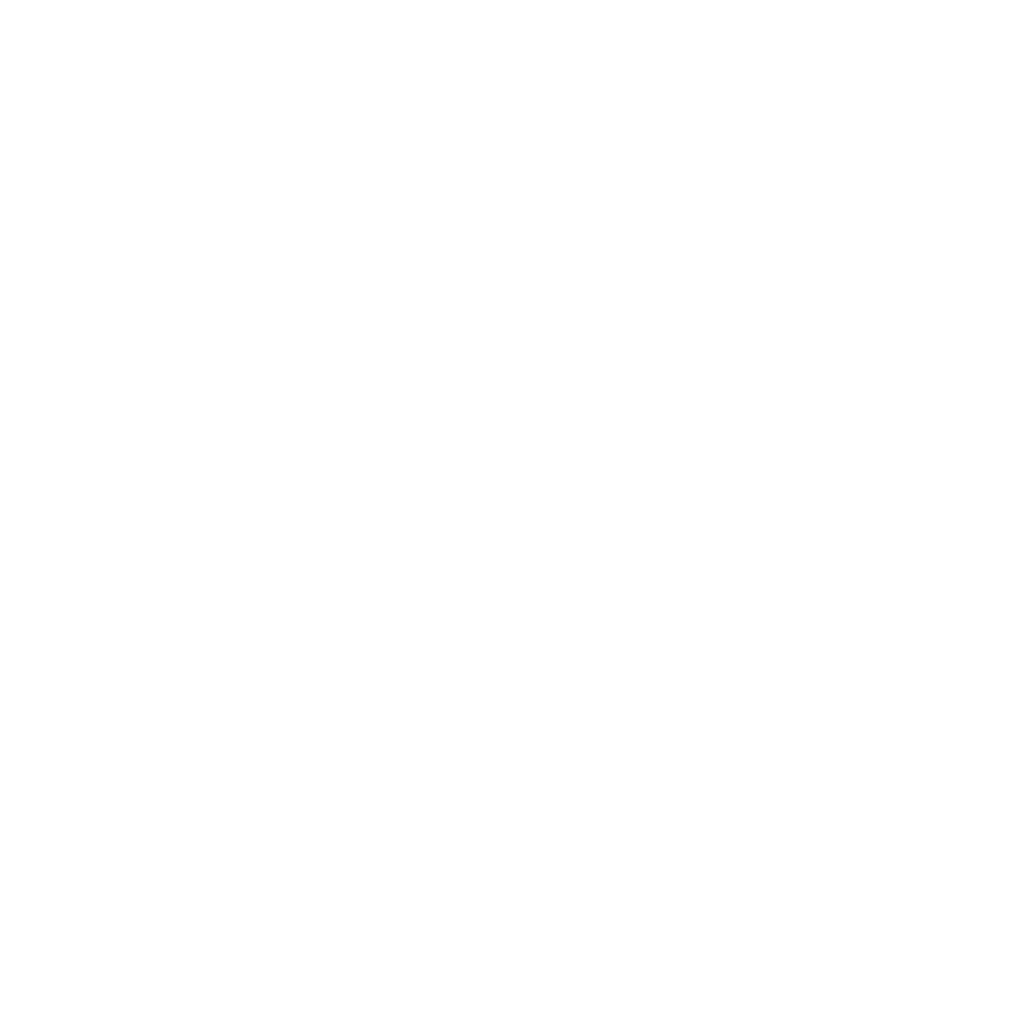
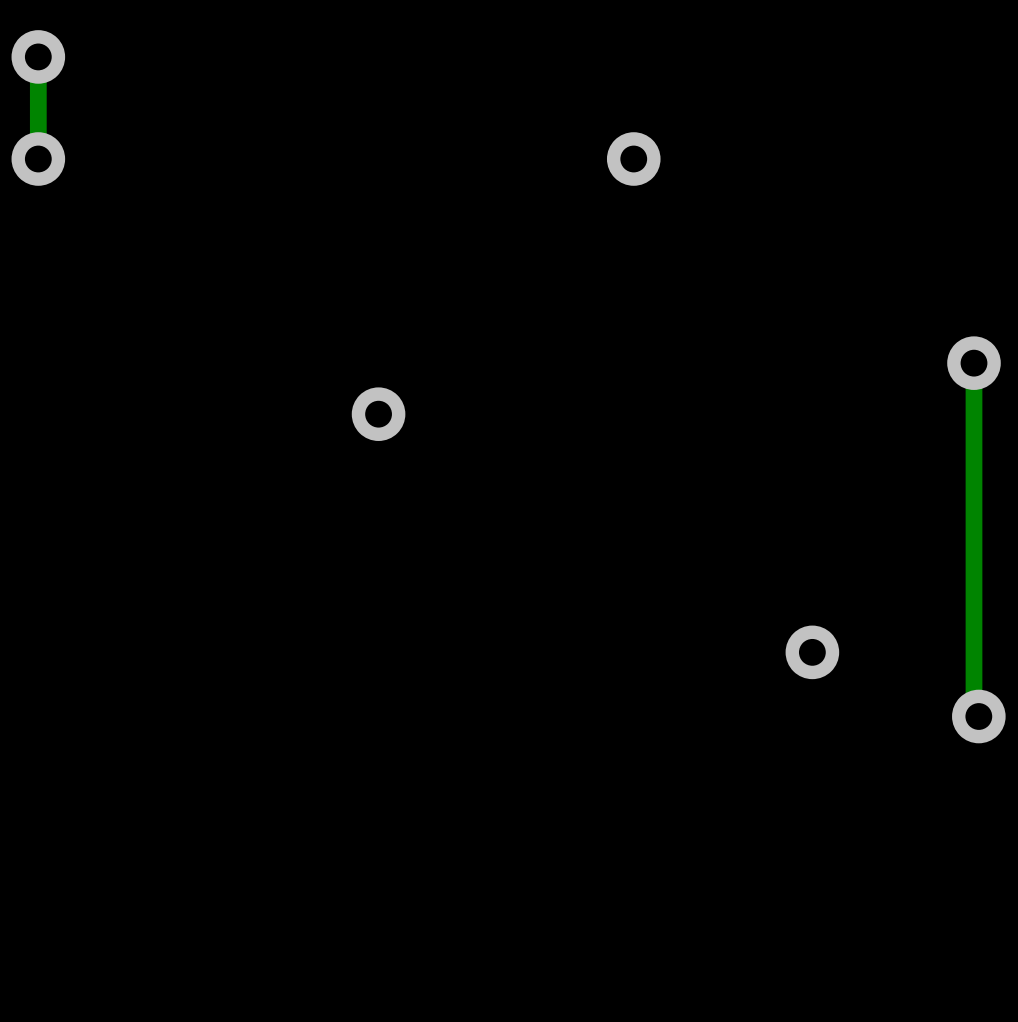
track: none -> (38, 56) (38, 159)
via: none -> (38, 56)
via: none -> (38, 159)
via: none -> (633, 159)
track: none -> (974, 363) (974, 711) (978, 716)
via: none -> (974, 363)
via: none -> (378, 414)
via: none -> (812, 652)
via: none -> (978, 716)

